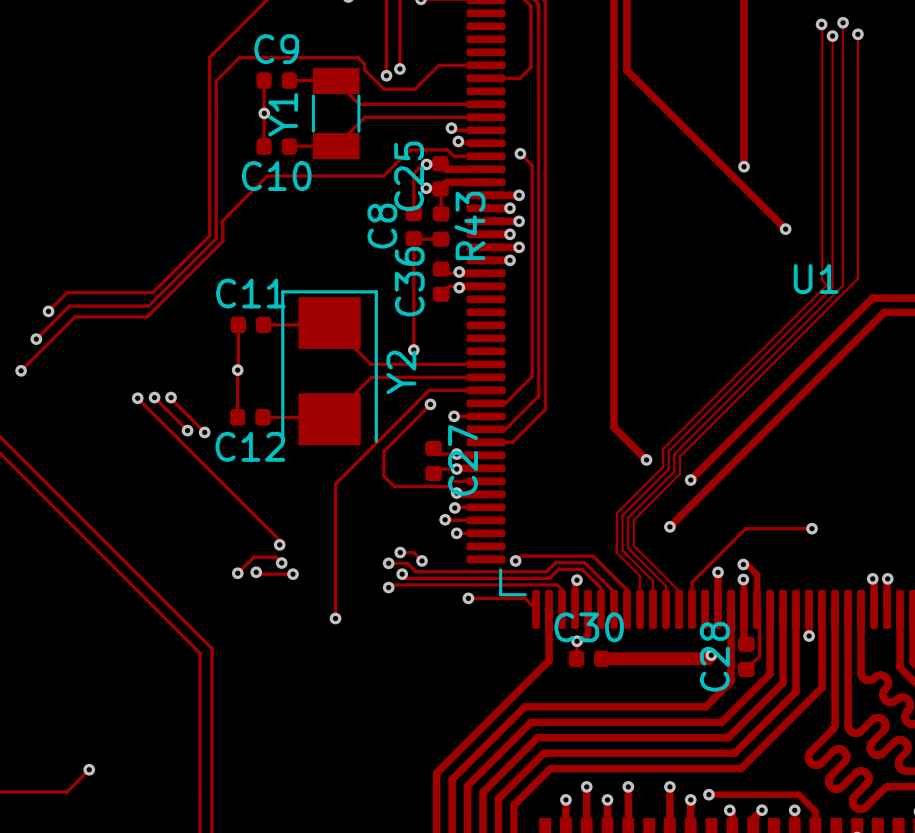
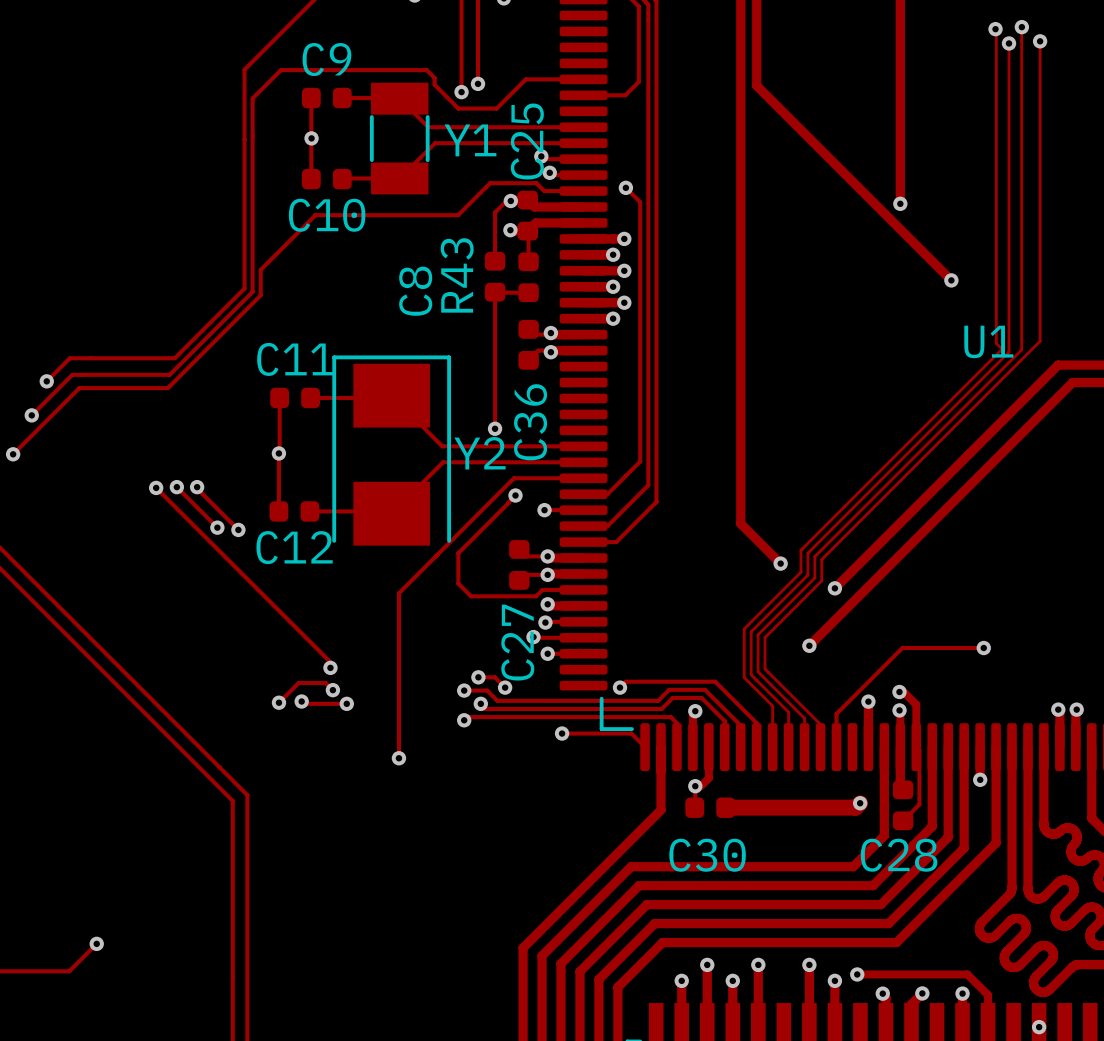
Y1 name rotation: 0° (283, 114) -> 90° clockwise (470, 140)
Y1 name position: Y1 (283, 114) -> Y1 (470, 140)
C25 name position: C25 (409, 176) -> C25 (527, 141)
R43 name position: R43 (469, 225) -> R43 (457, 275)
C8 name position: C8 (382, 226) -> C8 (415, 291)
C36 name position: C36 (409, 281) -> C36 (530, 422)
Y2 name rotation: 0° (401, 372) -> 90° clockwise (479, 453)
C27 name position: C27 (463, 460) -> C27 (517, 642)
C30 name position: C30 (589, 627) -> C30 (707, 855)
C28 name rotation: 0° (714, 656) -> 90° clockwise (899, 855)

